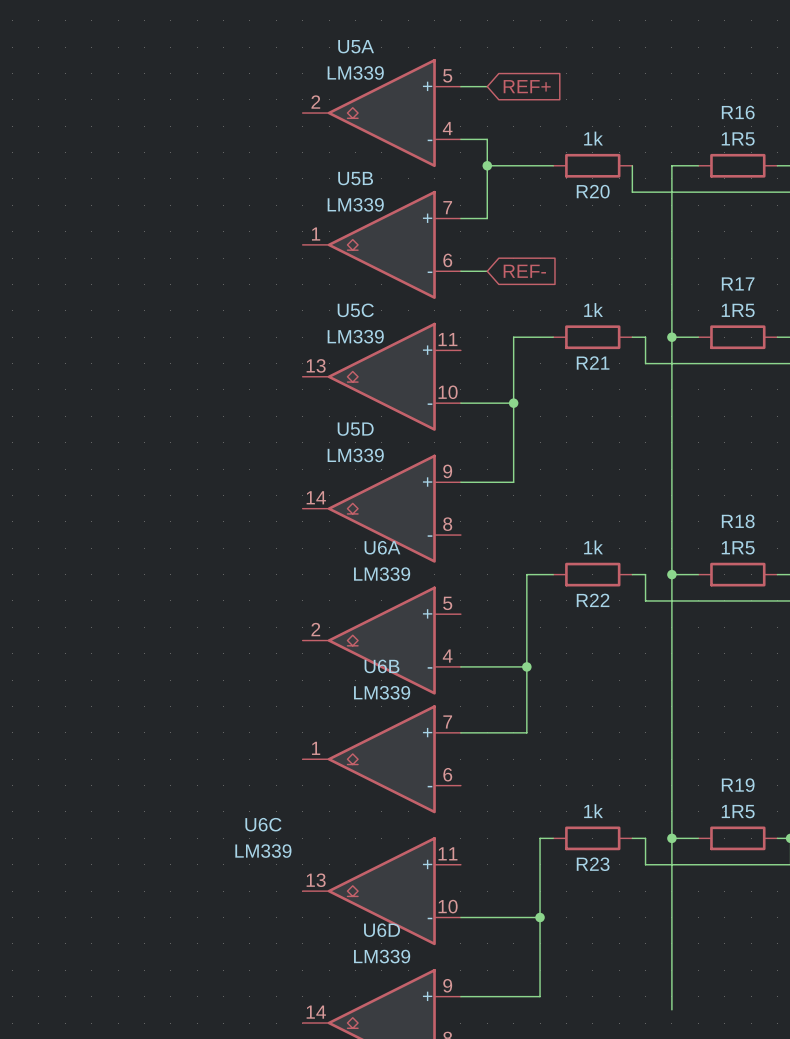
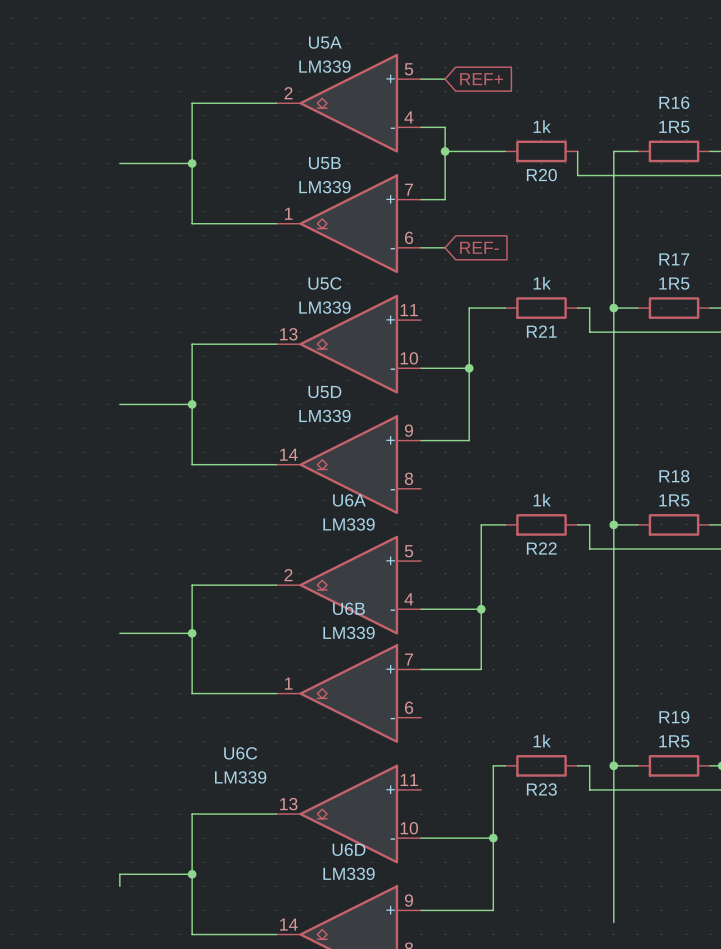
wire: none -> (276, 103) (192, 103) (192, 223) (276, 223)
wire: none -> (119, 163) (192, 163)
junction: none -> (192, 163)
wire: none -> (276, 344) (192, 344) (192, 464) (276, 464)
wire: none -> (119, 404) (192, 404)
junction: none -> (192, 404)
wire: none -> (276, 585) (192, 585) (192, 693) (276, 693)
wire: none -> (119, 633) (192, 633)
junction: none -> (192, 633)
wire: none -> (276, 814) (192, 814) (192, 934) (276, 934)
wire: none -> (192, 874) (119, 874) (119, 886)
junction: none -> (192, 874)

